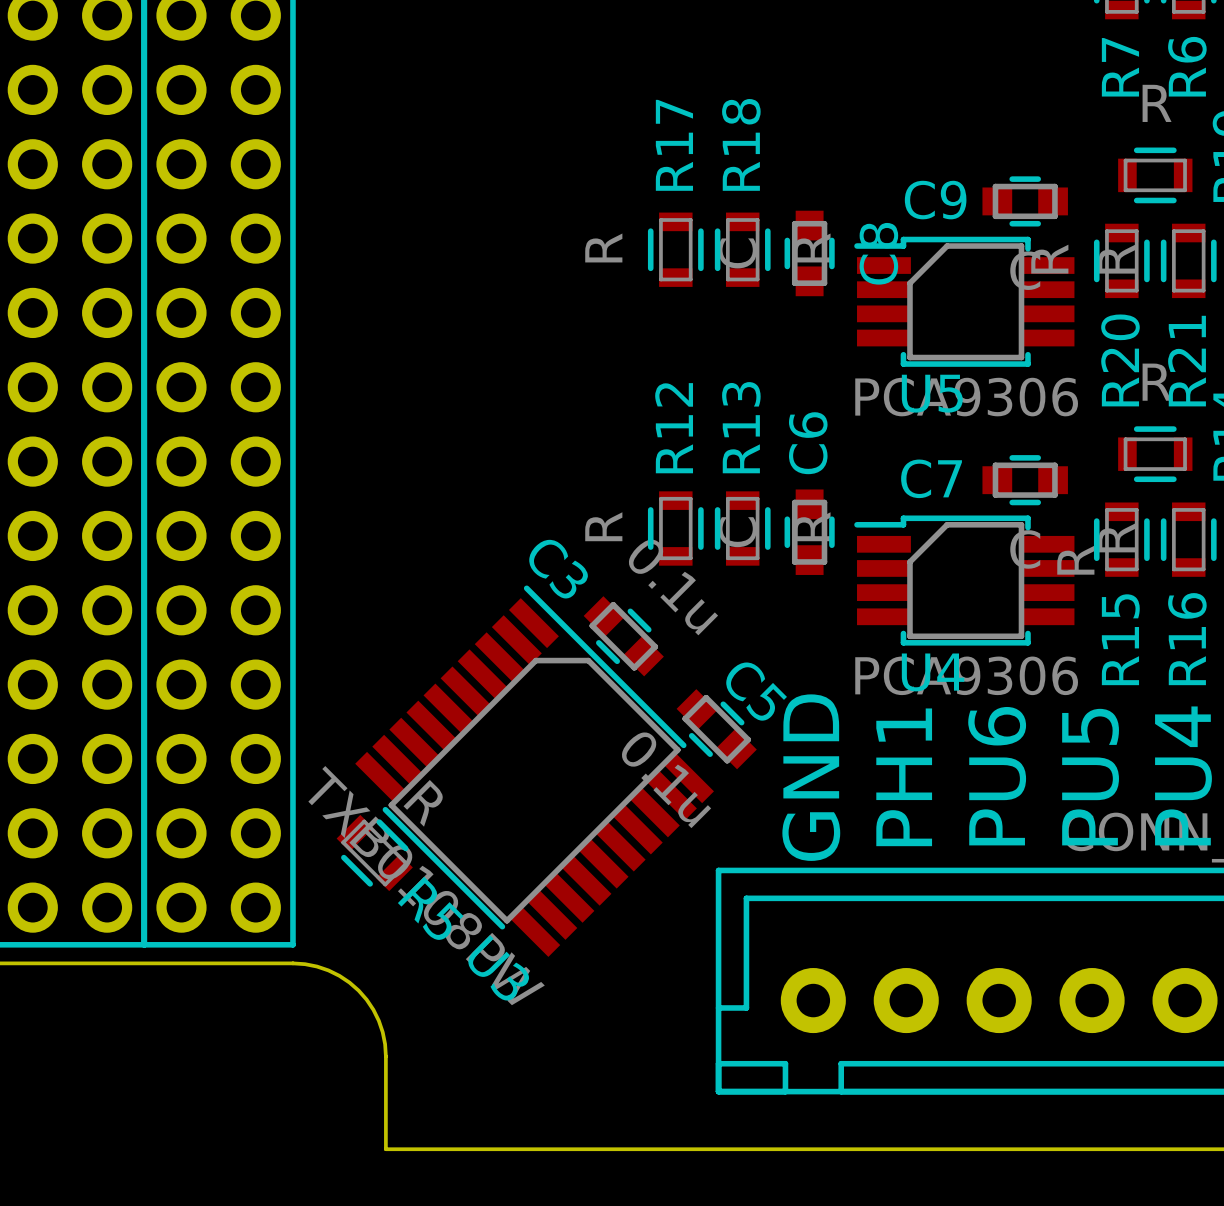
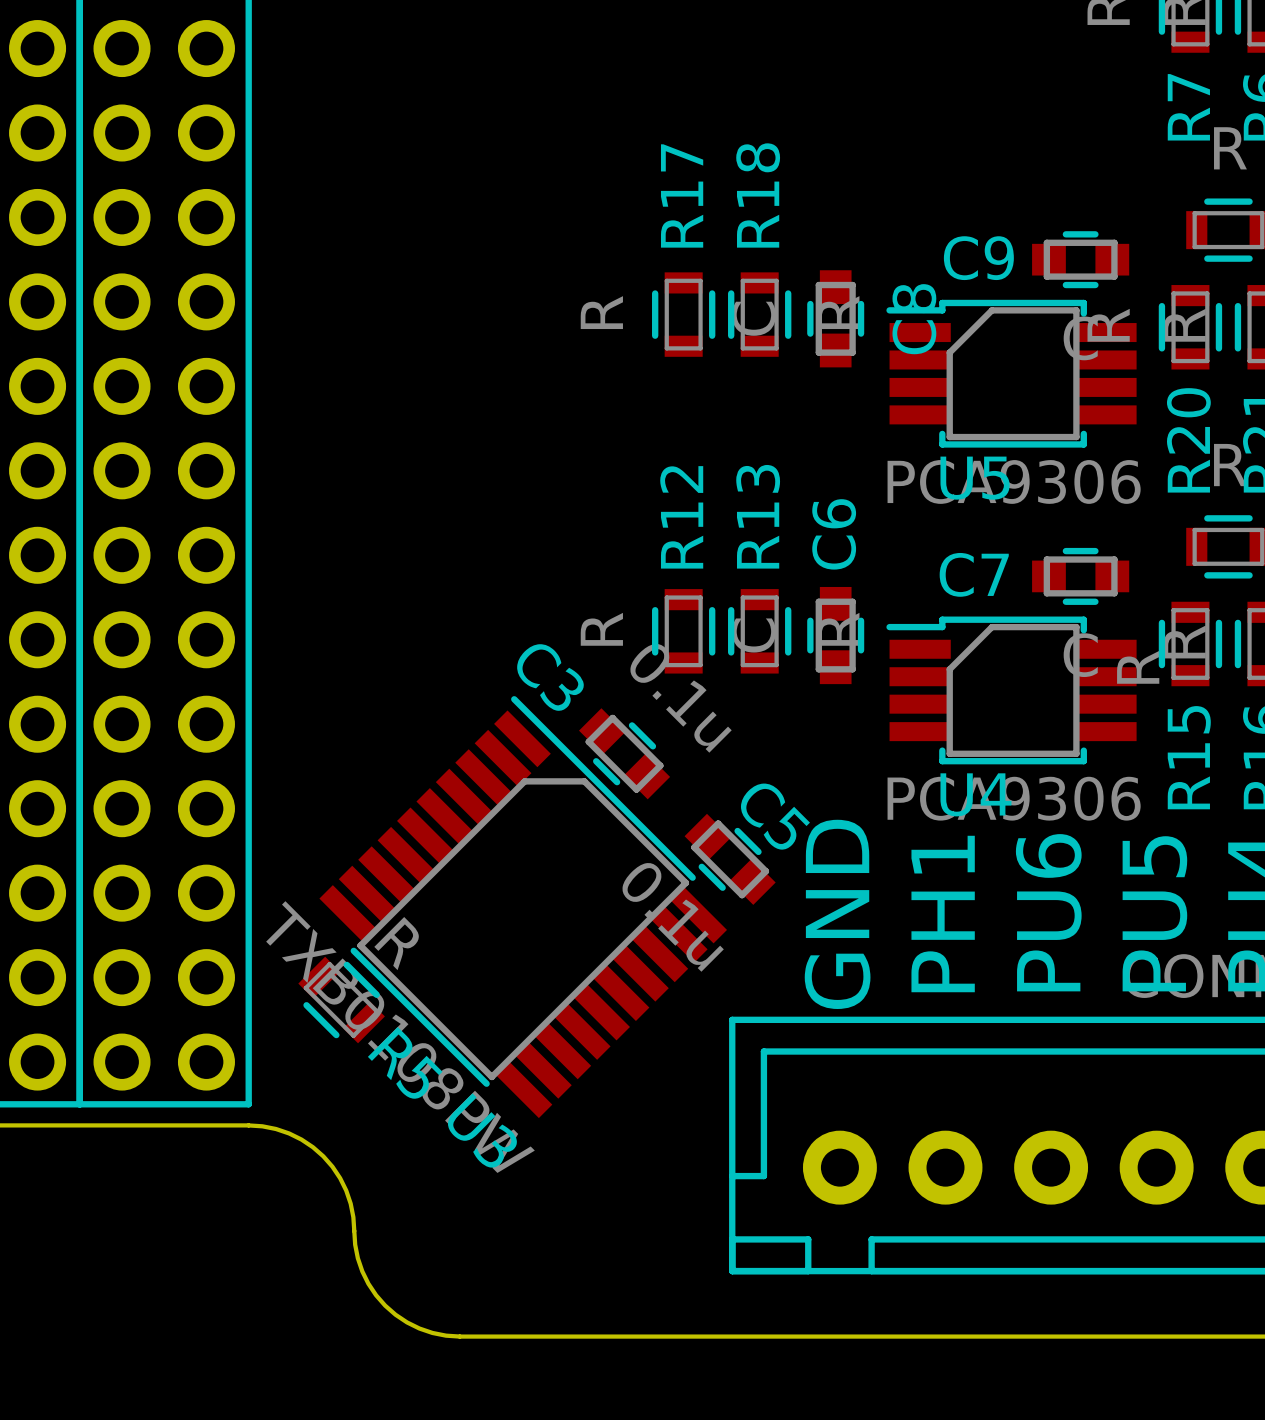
board edge: (385, 1056) (385, 1149) (478, 1149) -> (354, 1230) (355, 1244) (362, 1271) (376, 1295) (385, 1305) (407, 1322) (419, 1328) (446, 1335) (459, 1336)

